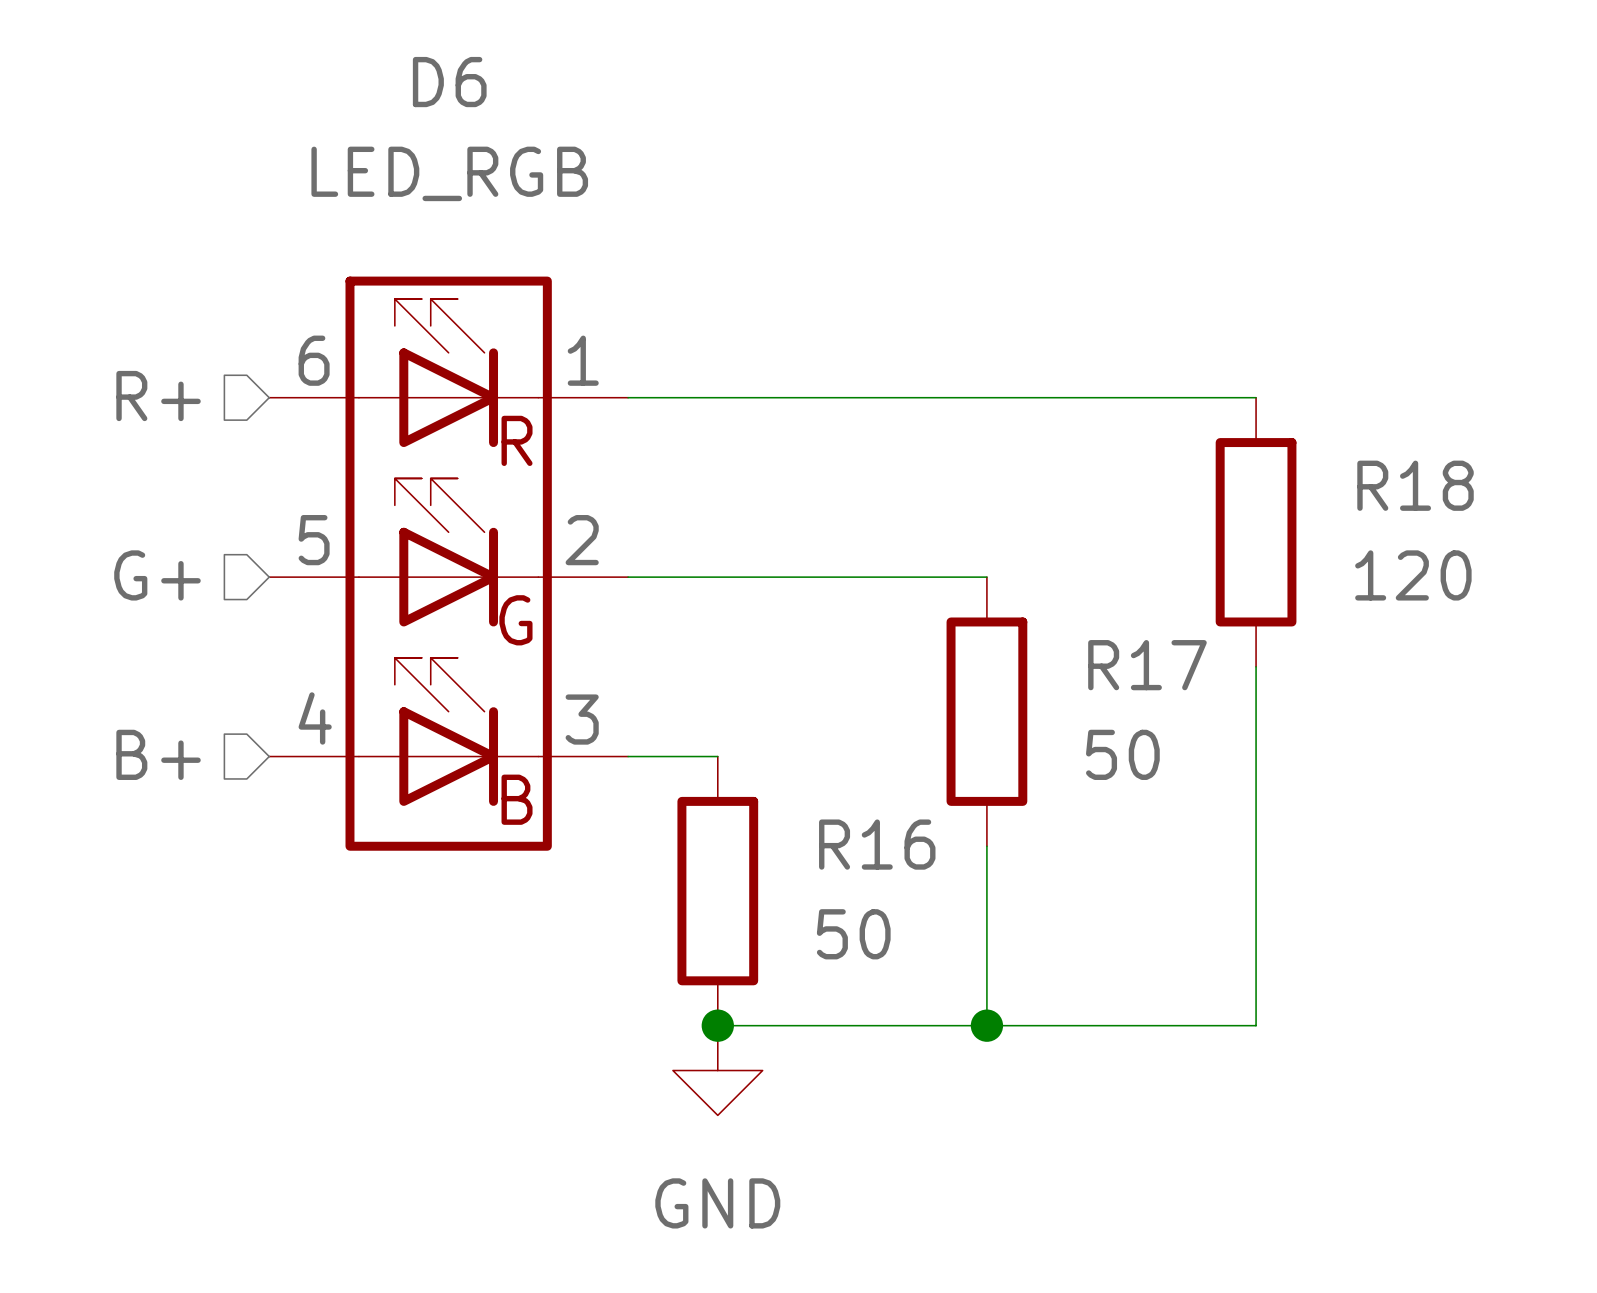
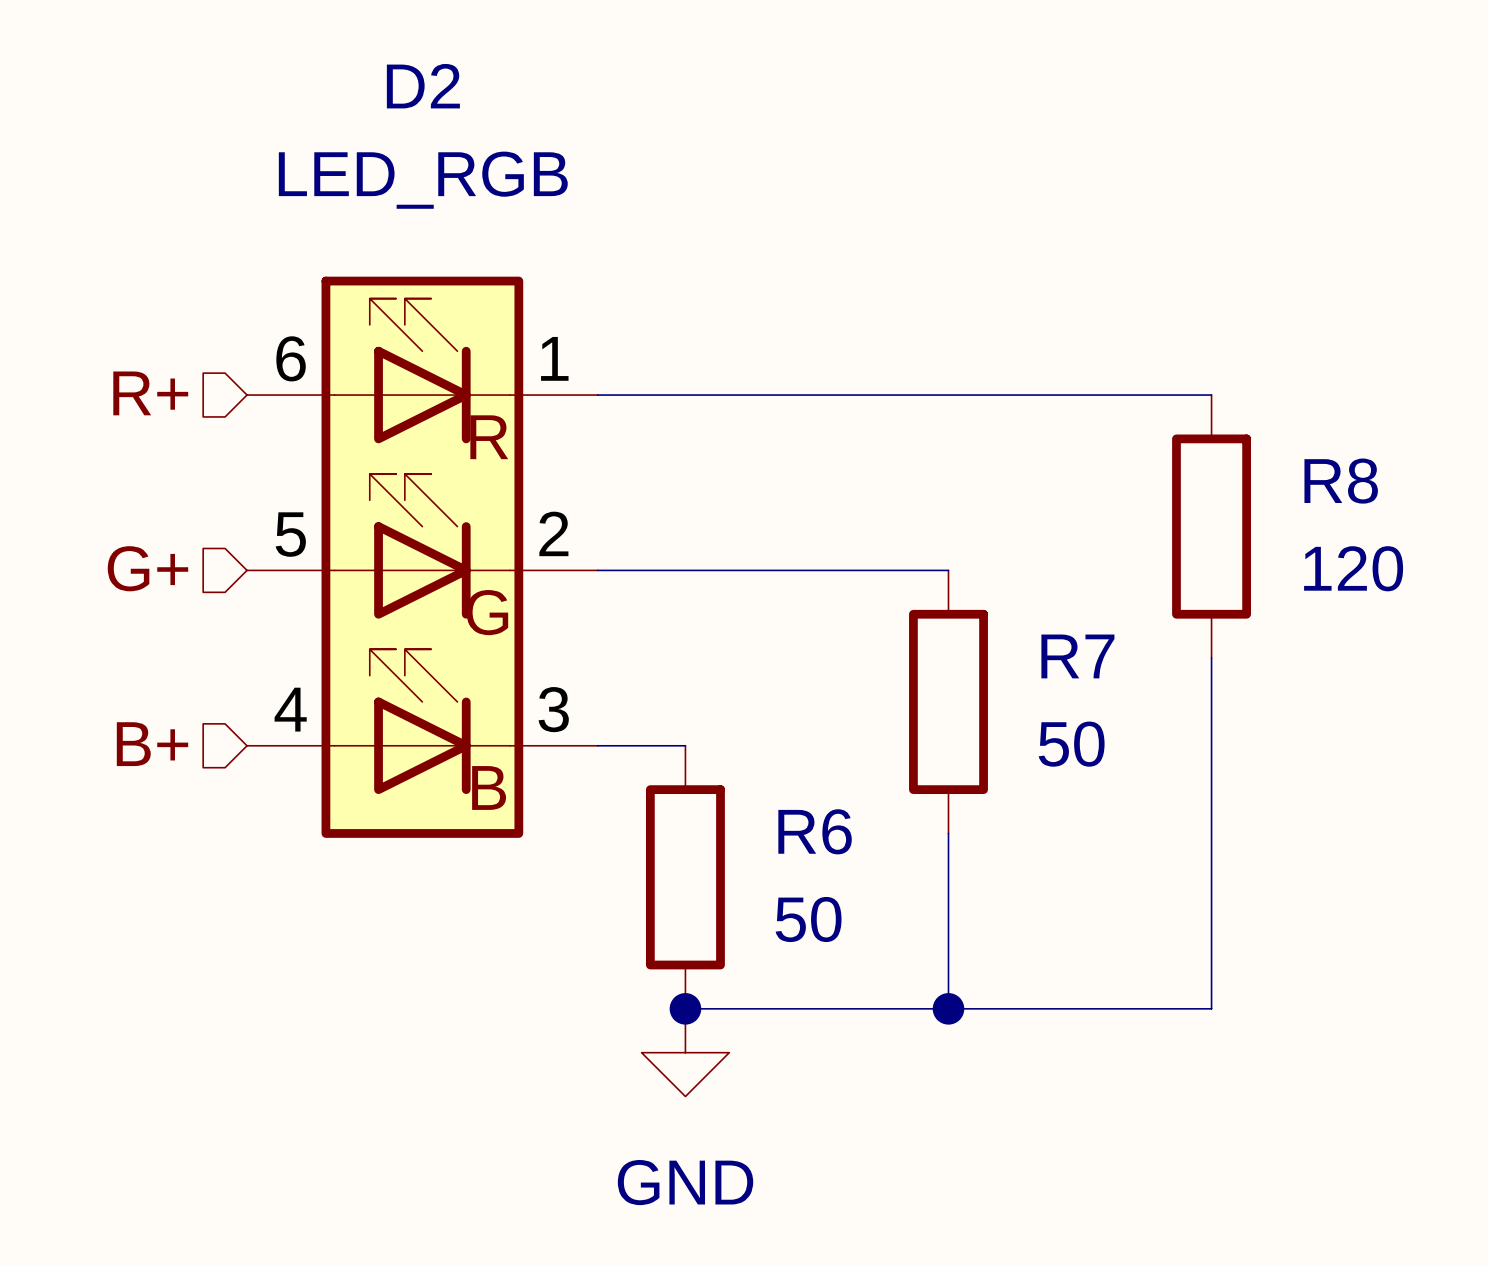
D6 name: D6 (449, 82) -> D2 (423, 86)
R18 name: R18 (1415, 485) -> R8 (1341, 481)
R17 name: R17 (1147, 665) -> R7 (1077, 656)
R16 name: R16 (877, 844) -> R6 (815, 831)

